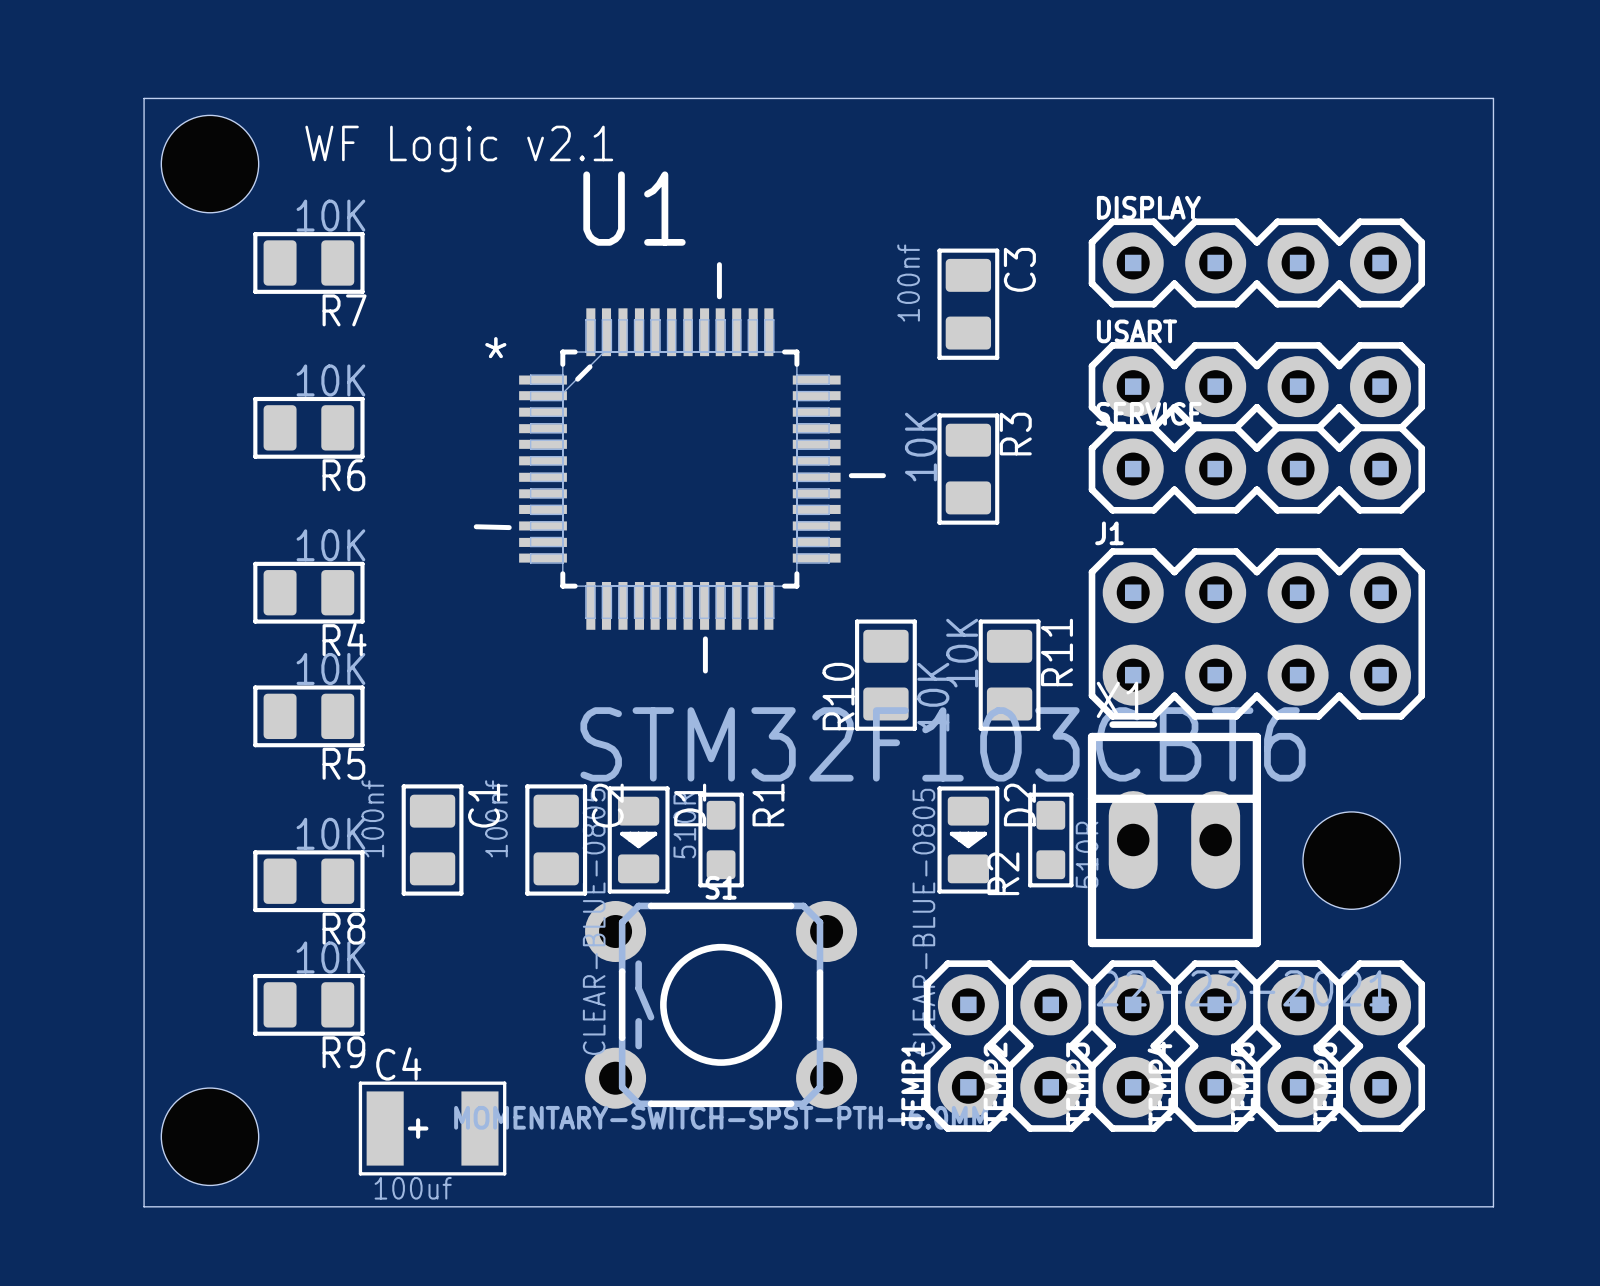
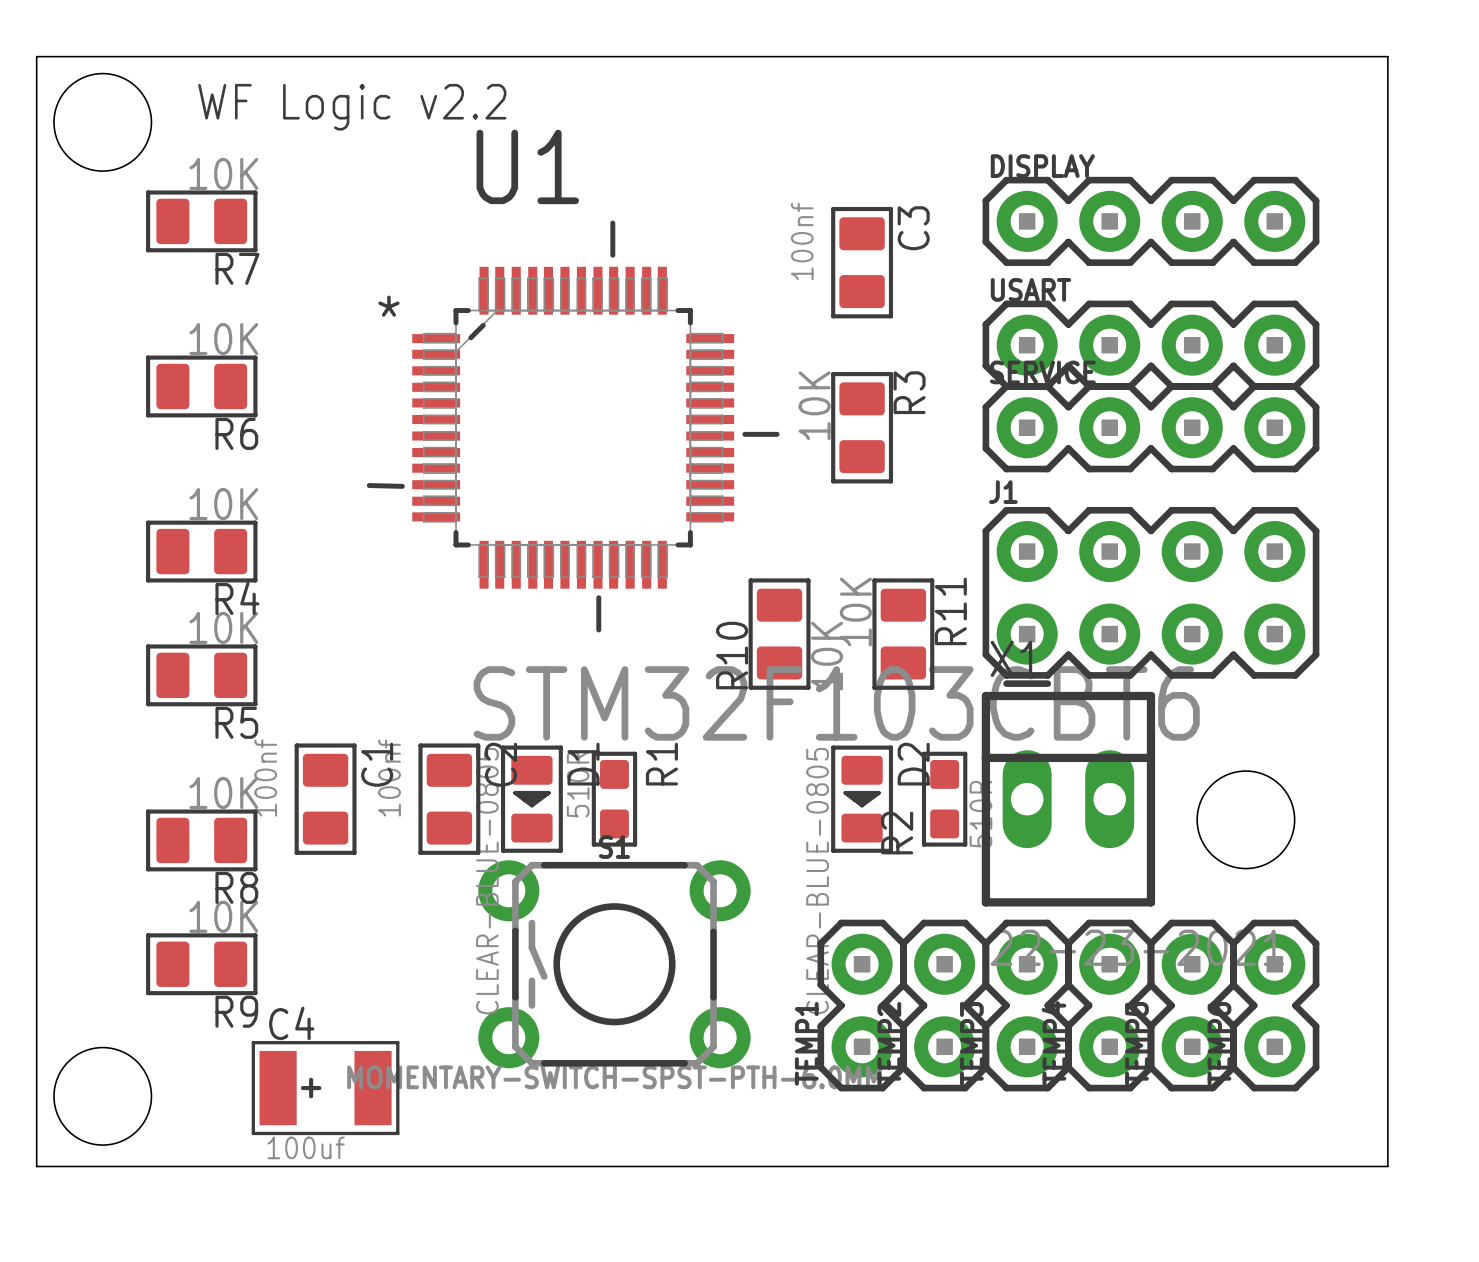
text: WF Logic v2.1 (459, 148) -> WF Logic v2.2 (352, 107)

